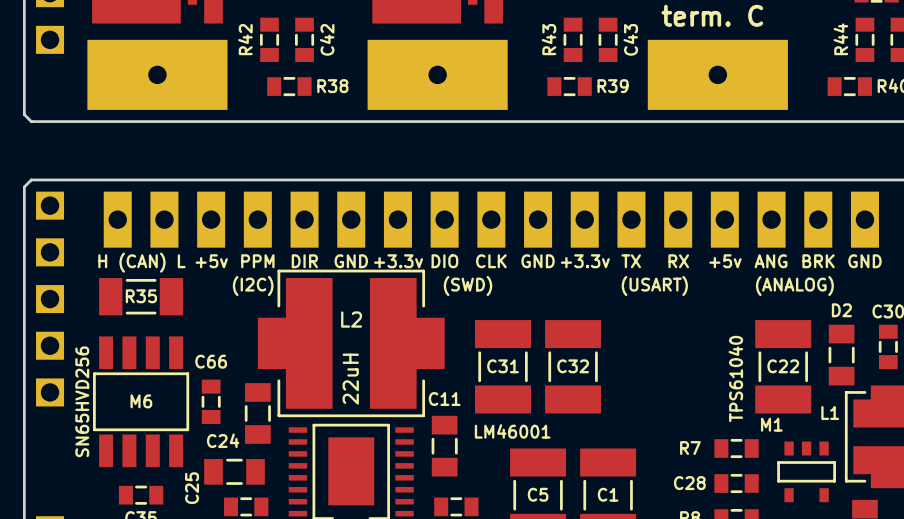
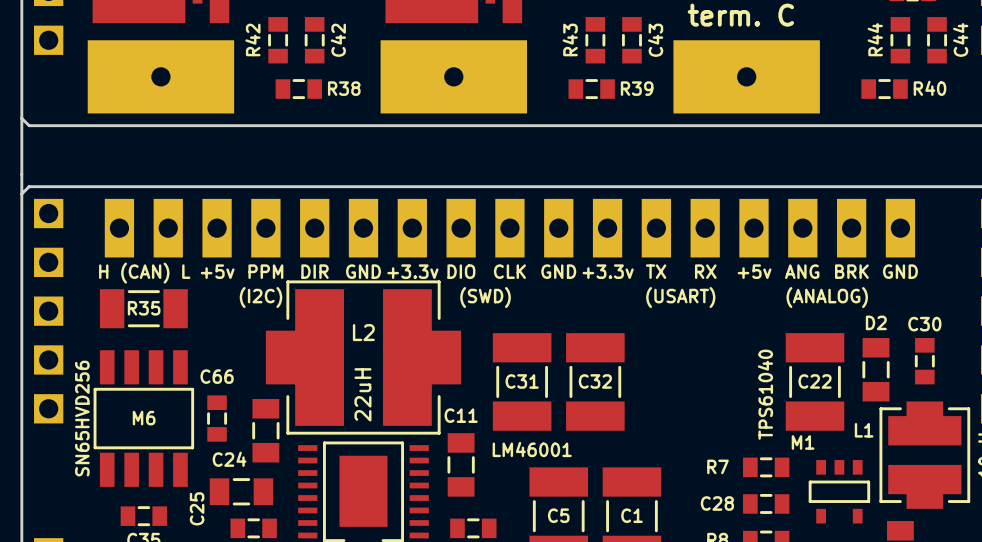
board edge: none -> (21, 118) (21, 194)

